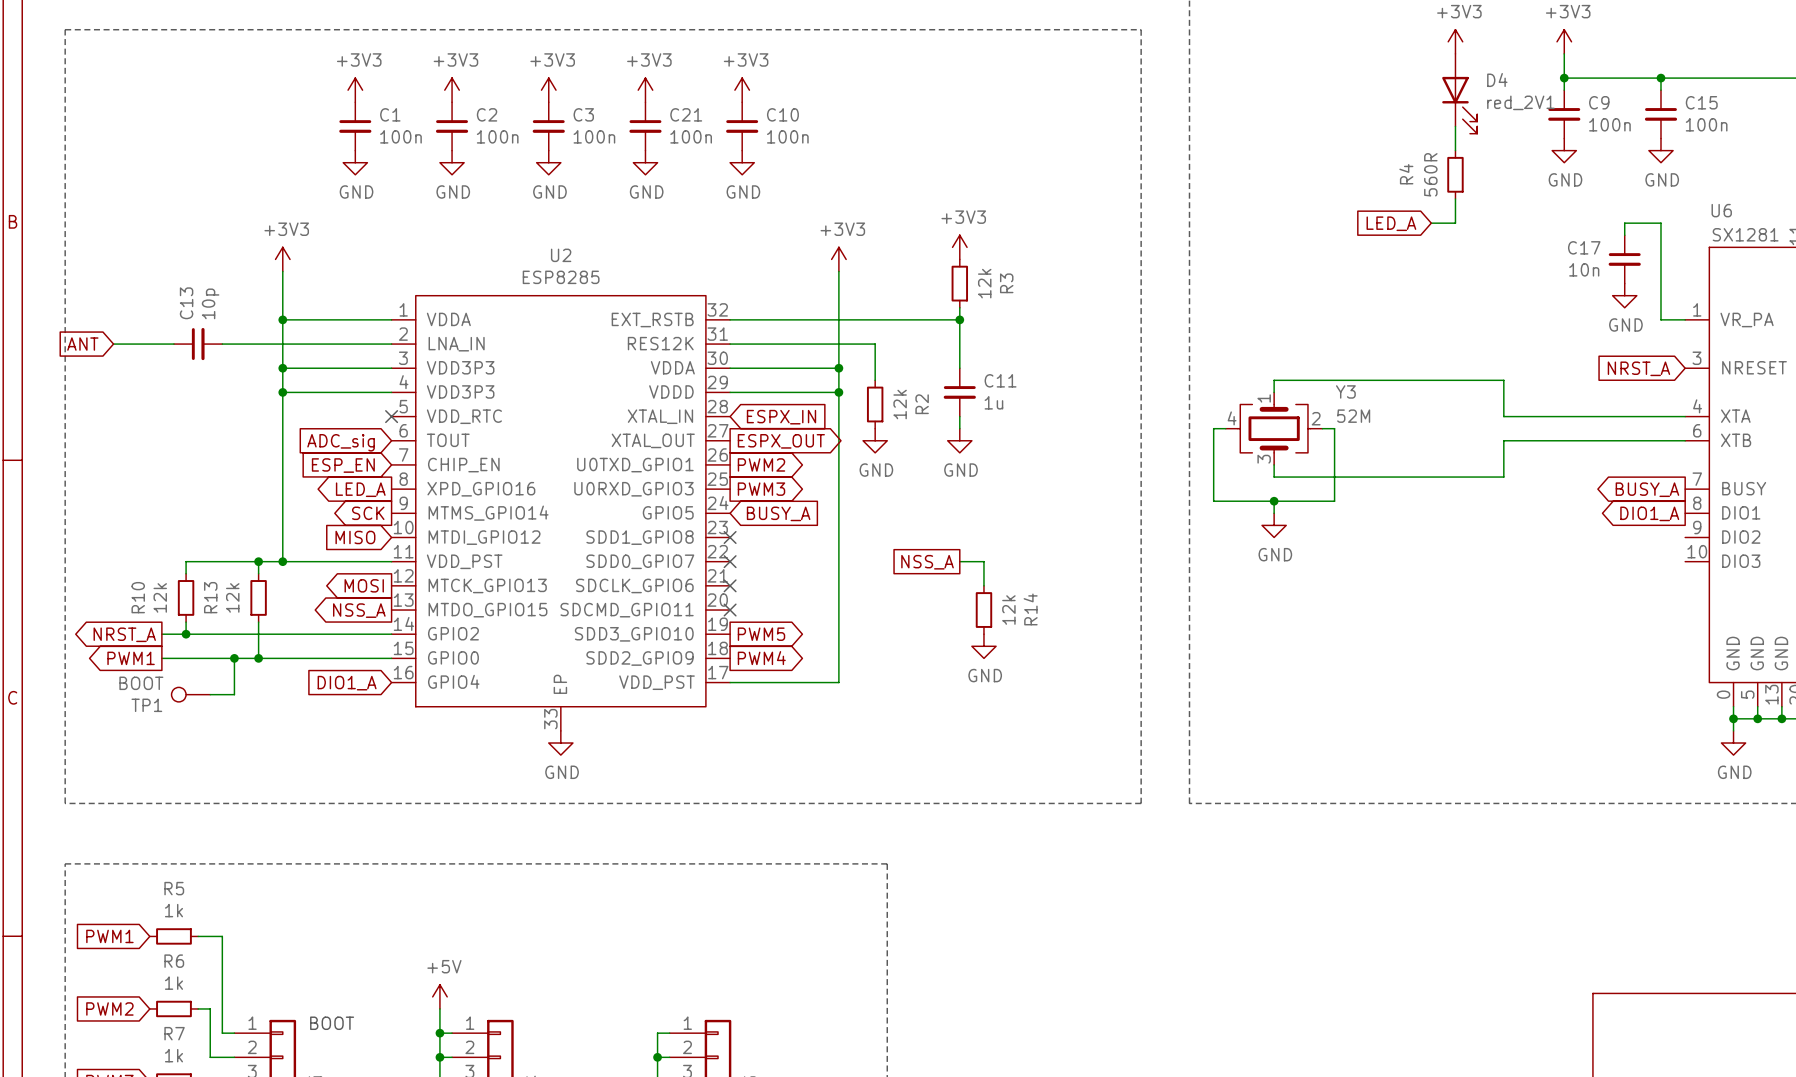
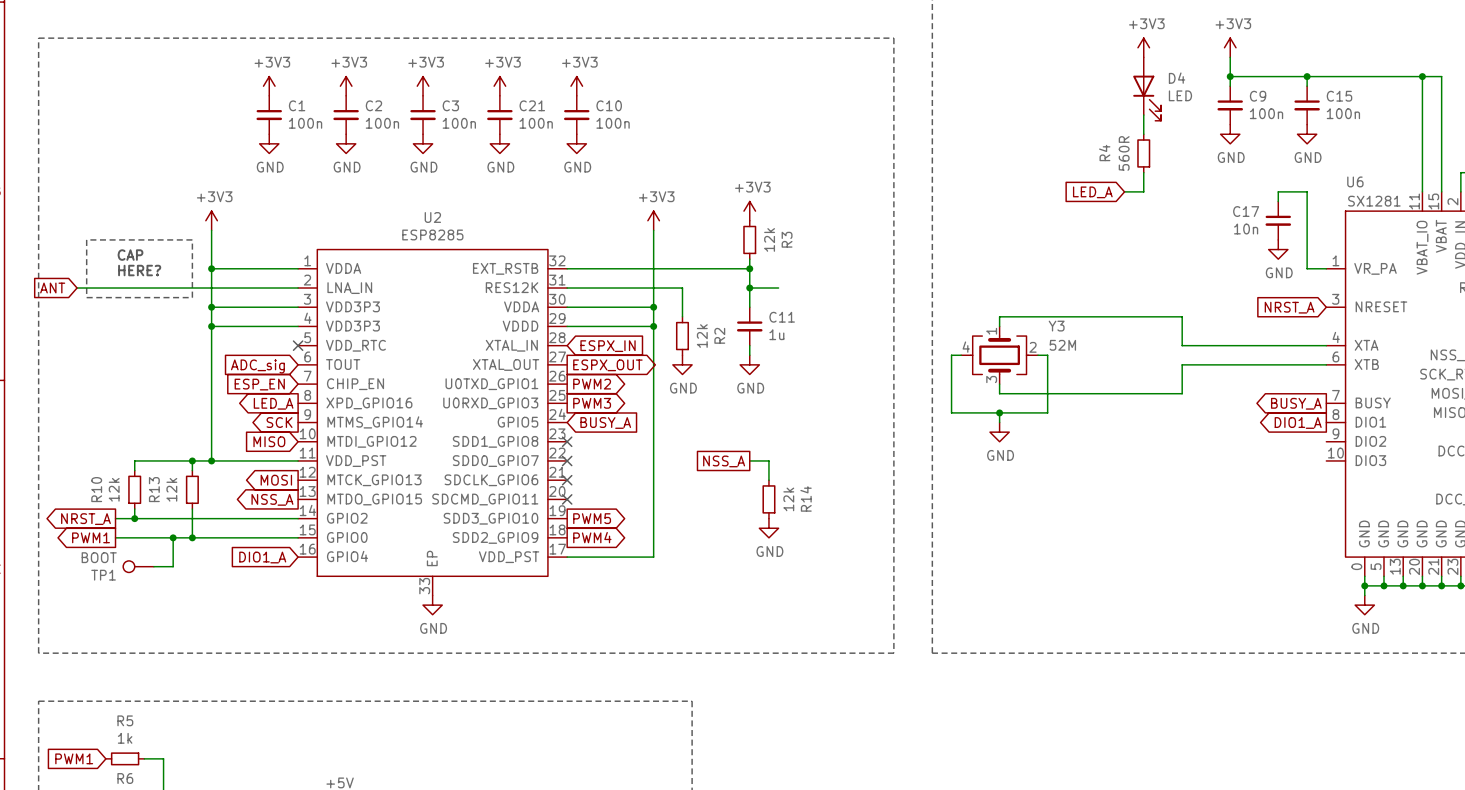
D4 value: red_2V1 (1520, 102) -> LED (1180, 95)
line: none -> (86, 239) (86, 297) (192, 297) (192, 239) (86, 239)
text: none -> CAP (130, 255)
text: none -> HERE? (139, 270)
C13: 10p (198, 344) -> none
wire: none -> (749, 288) (778, 288)
junction: none -> (749, 288)

